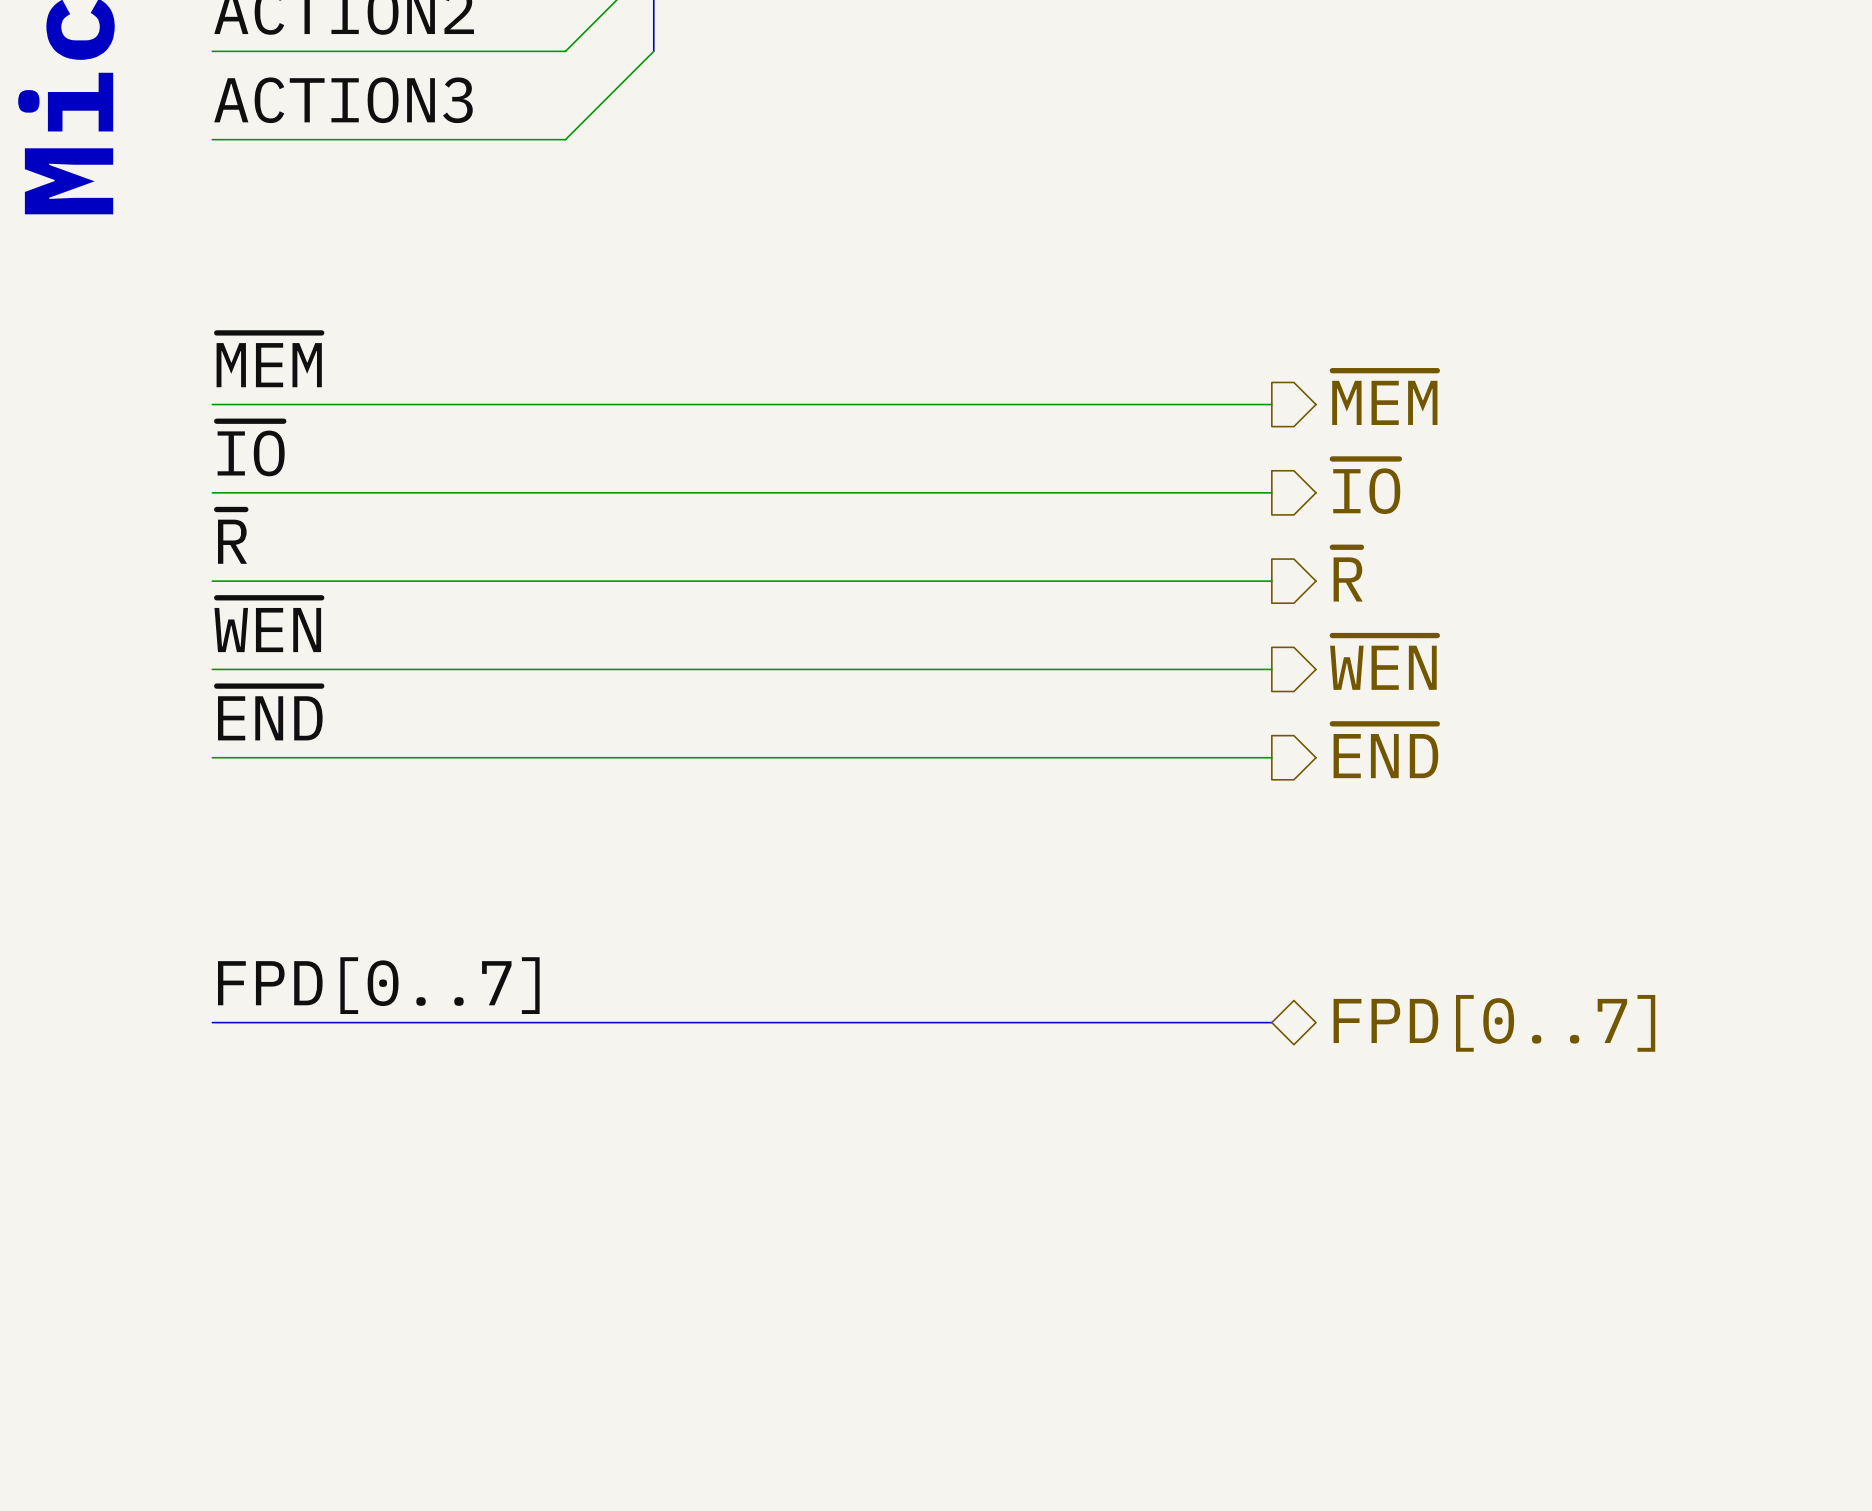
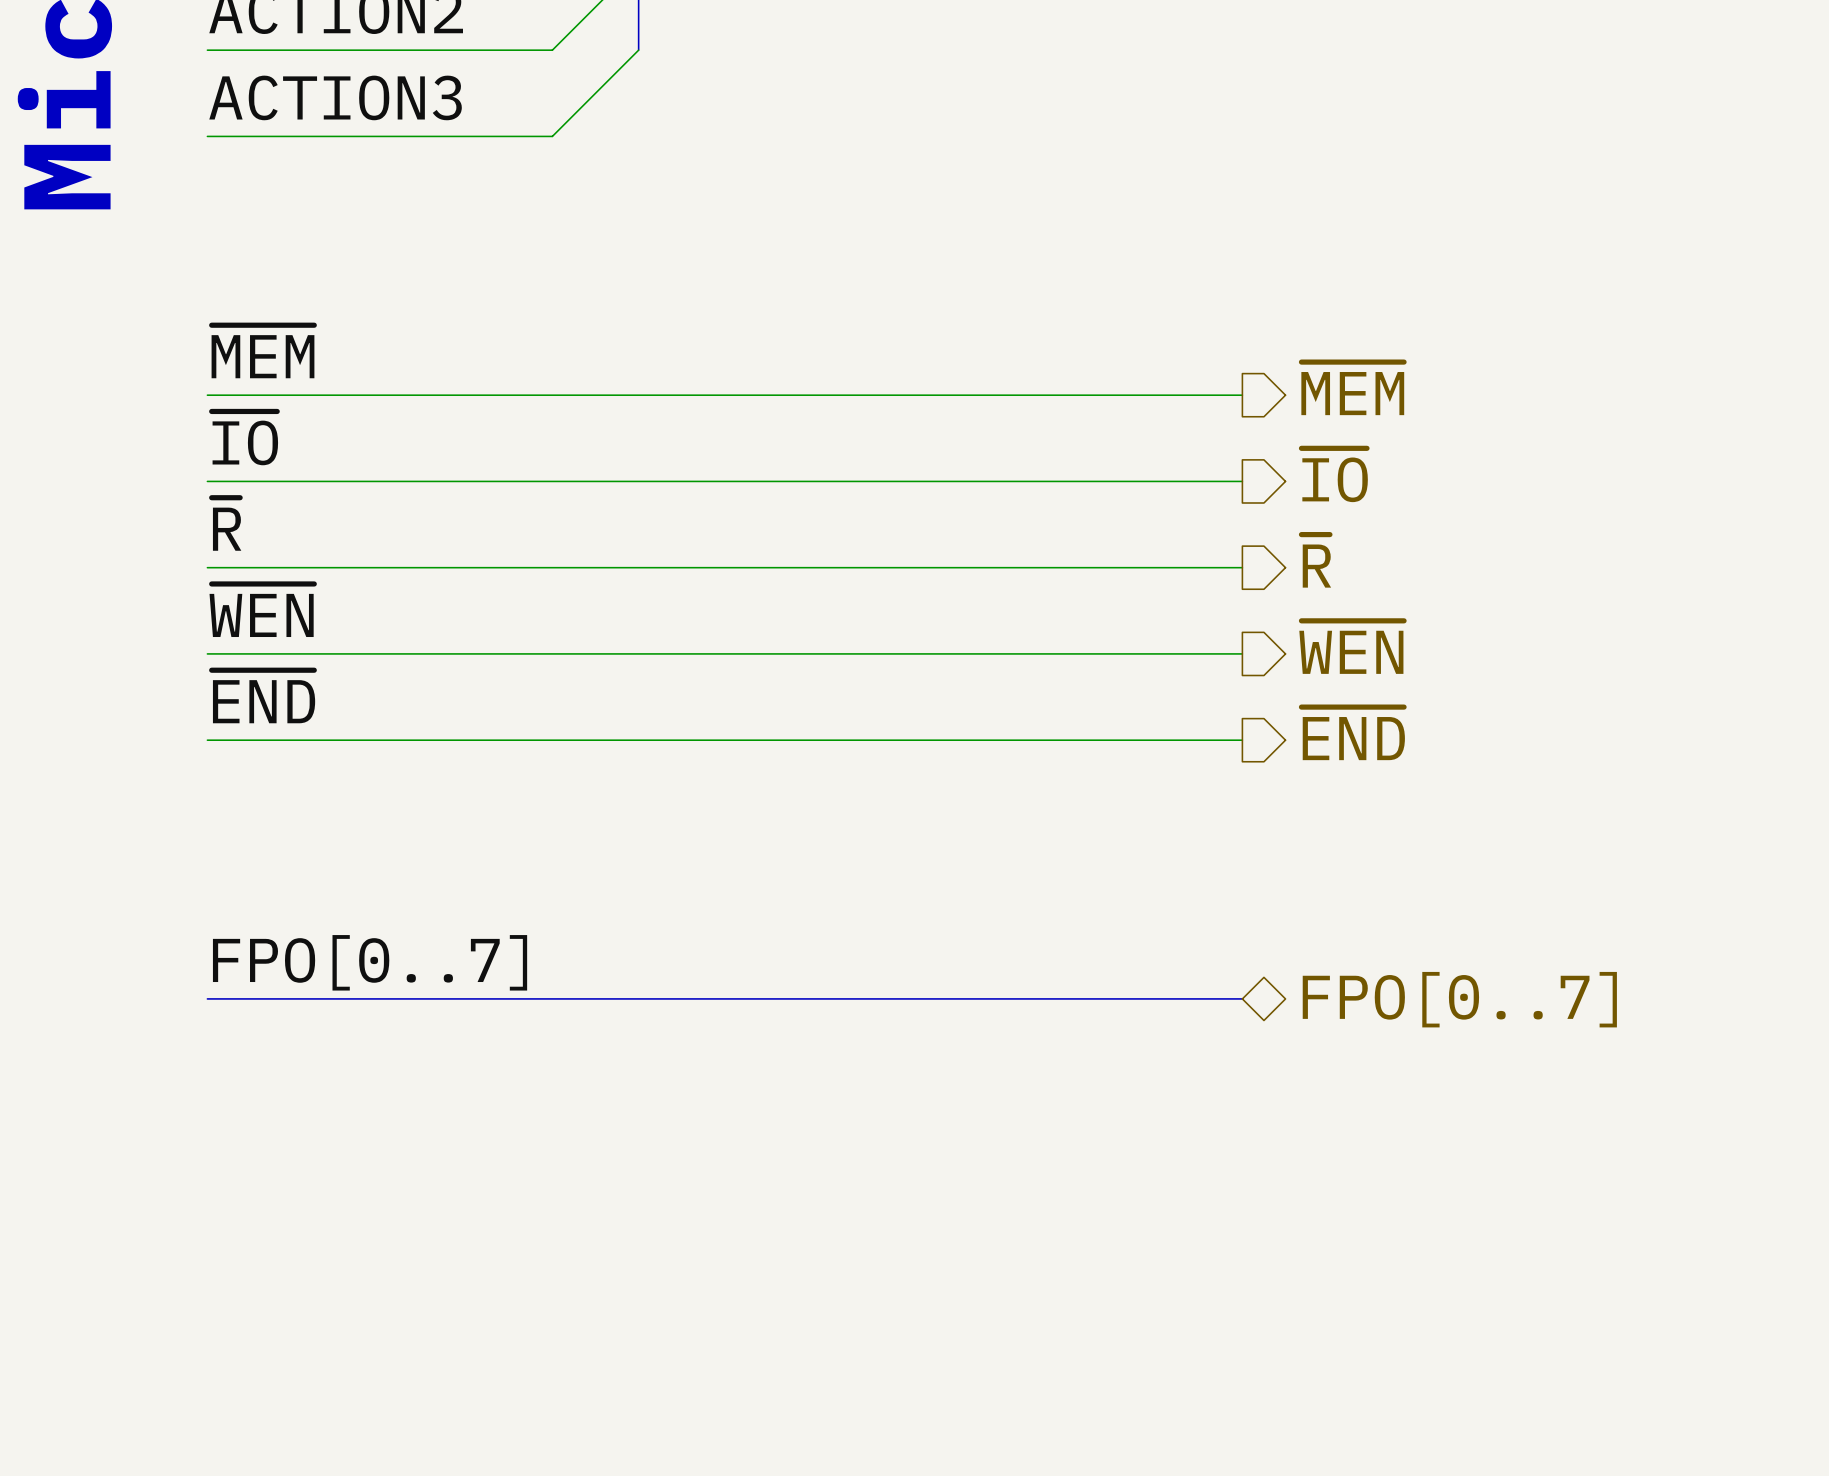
label: FPD[0..7] (378, 985) -> FPO[0..7] (370, 962)
hierarchical label: FPD[0..7] (1494, 1023) -> FPO[0..7] (1459, 999)

